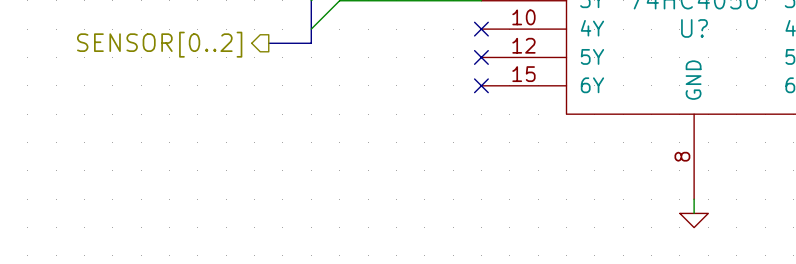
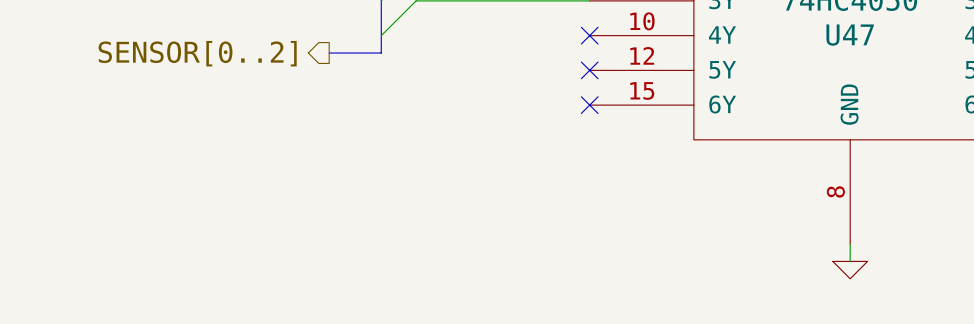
U? name: U? (694, 28) -> U47 (850, 35)

